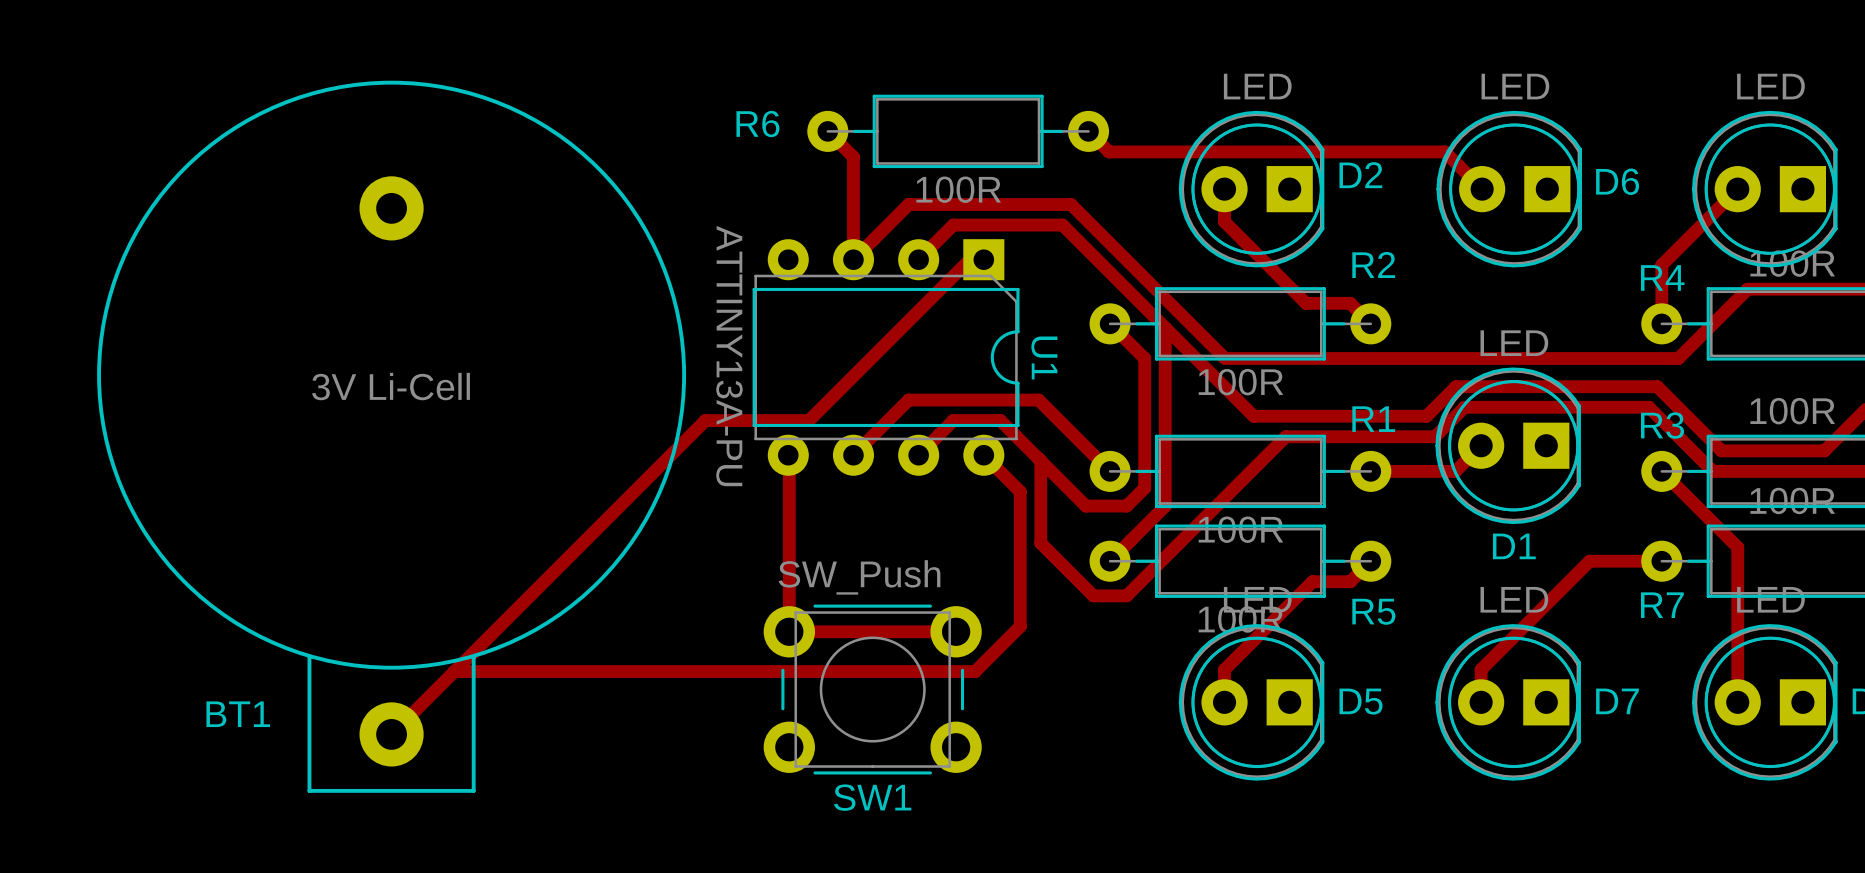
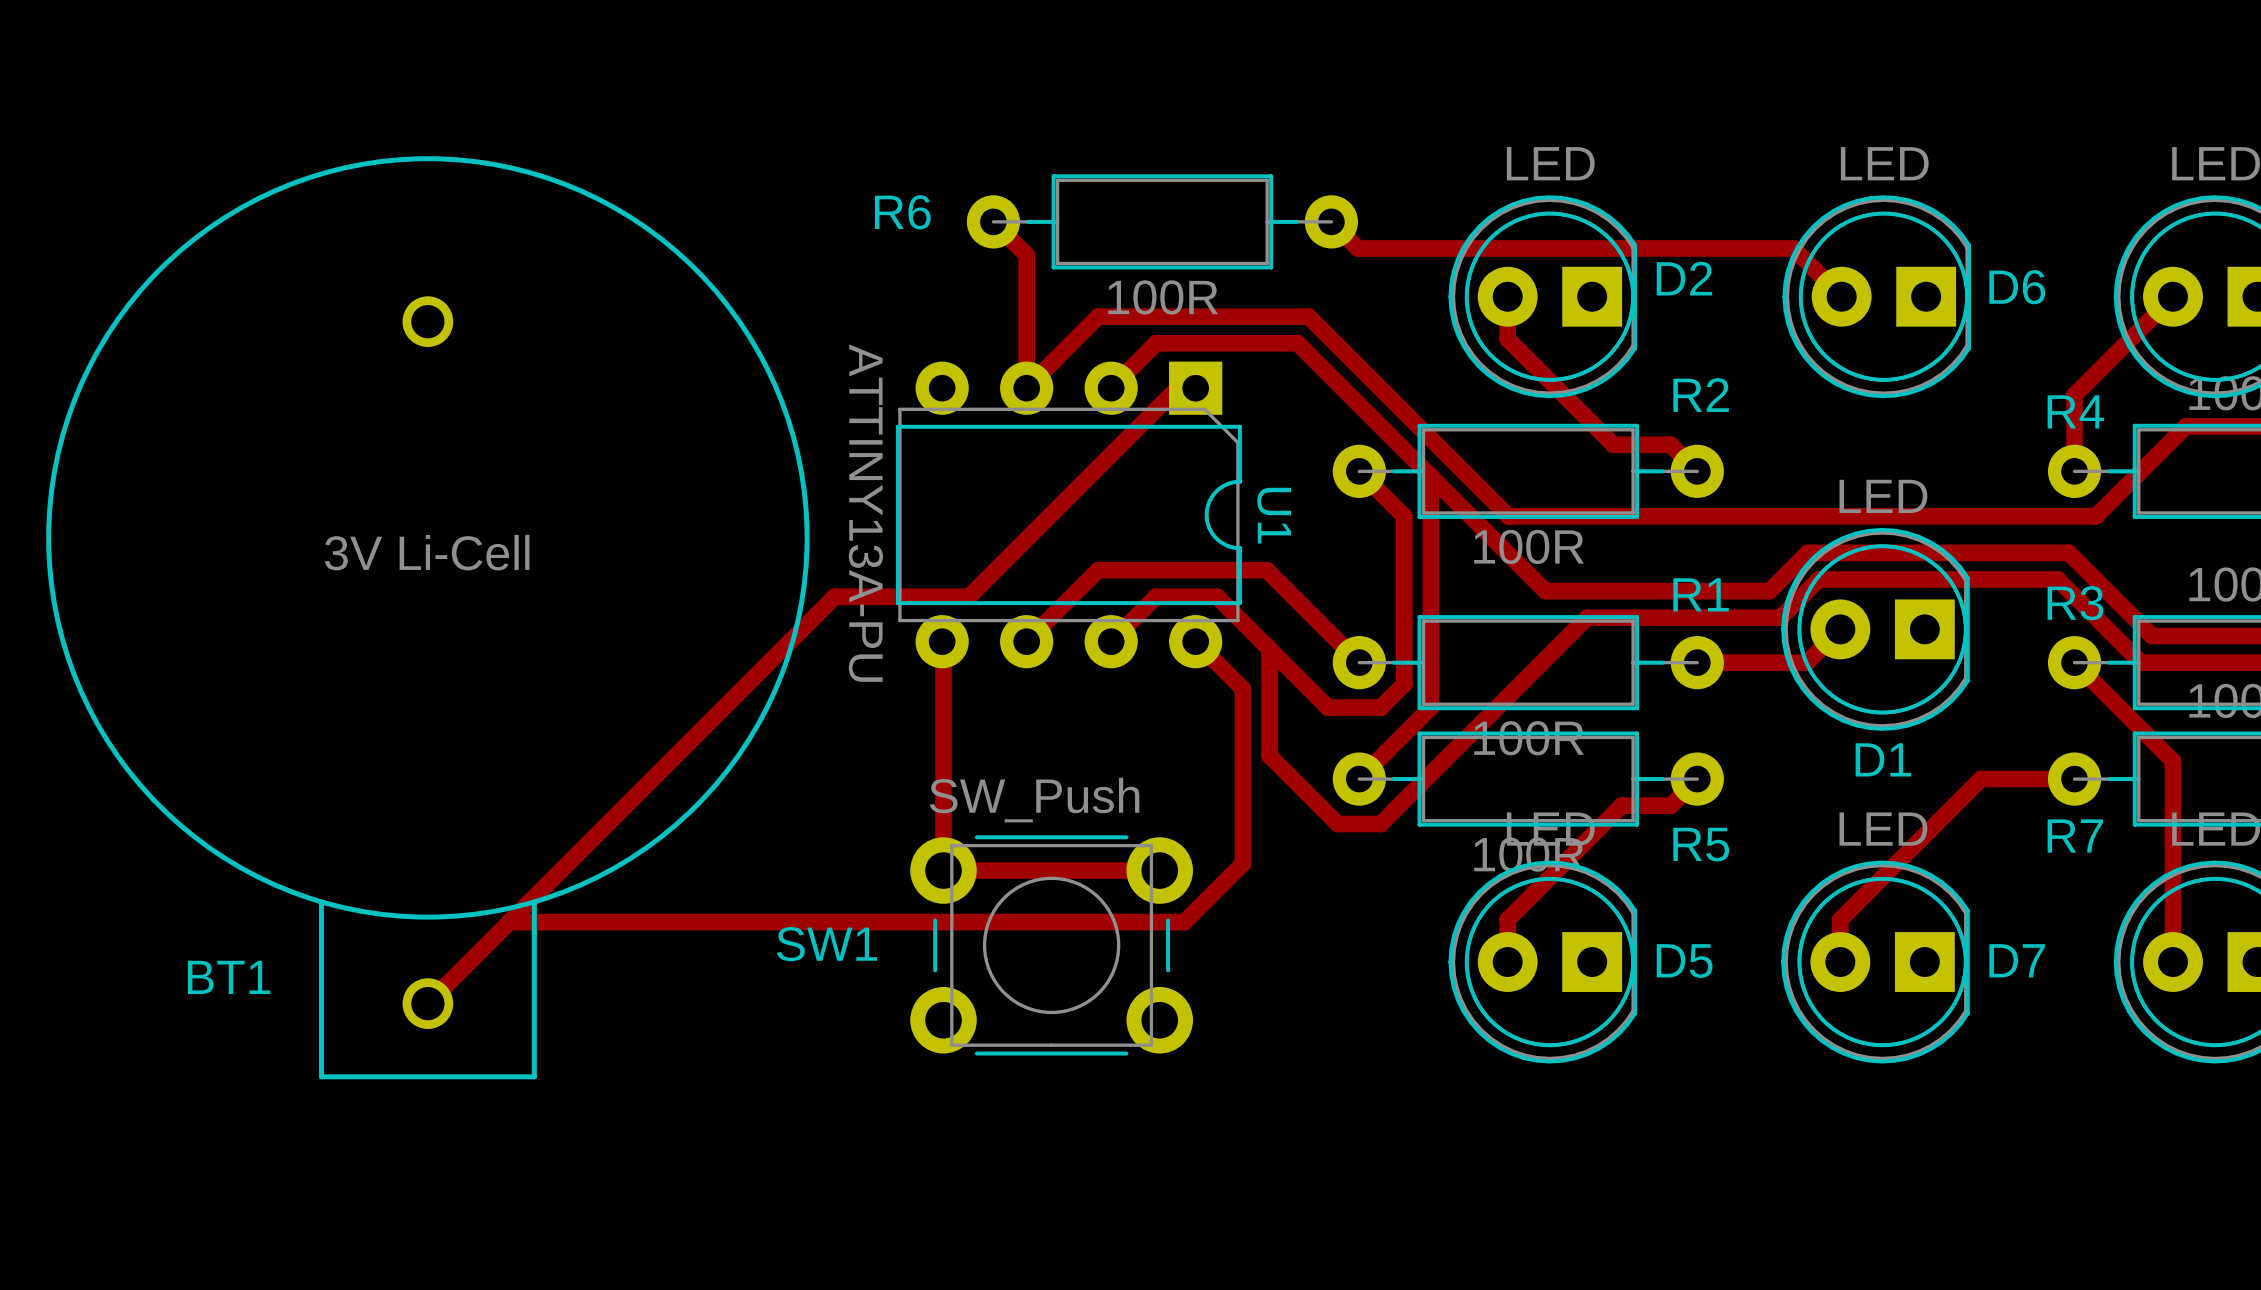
BT1 footprint: [97, 80, 687, 793] -> [46, 156, 810, 1080]
SW1 name position: SW1 (872, 797) -> SW1 (827, 944)

